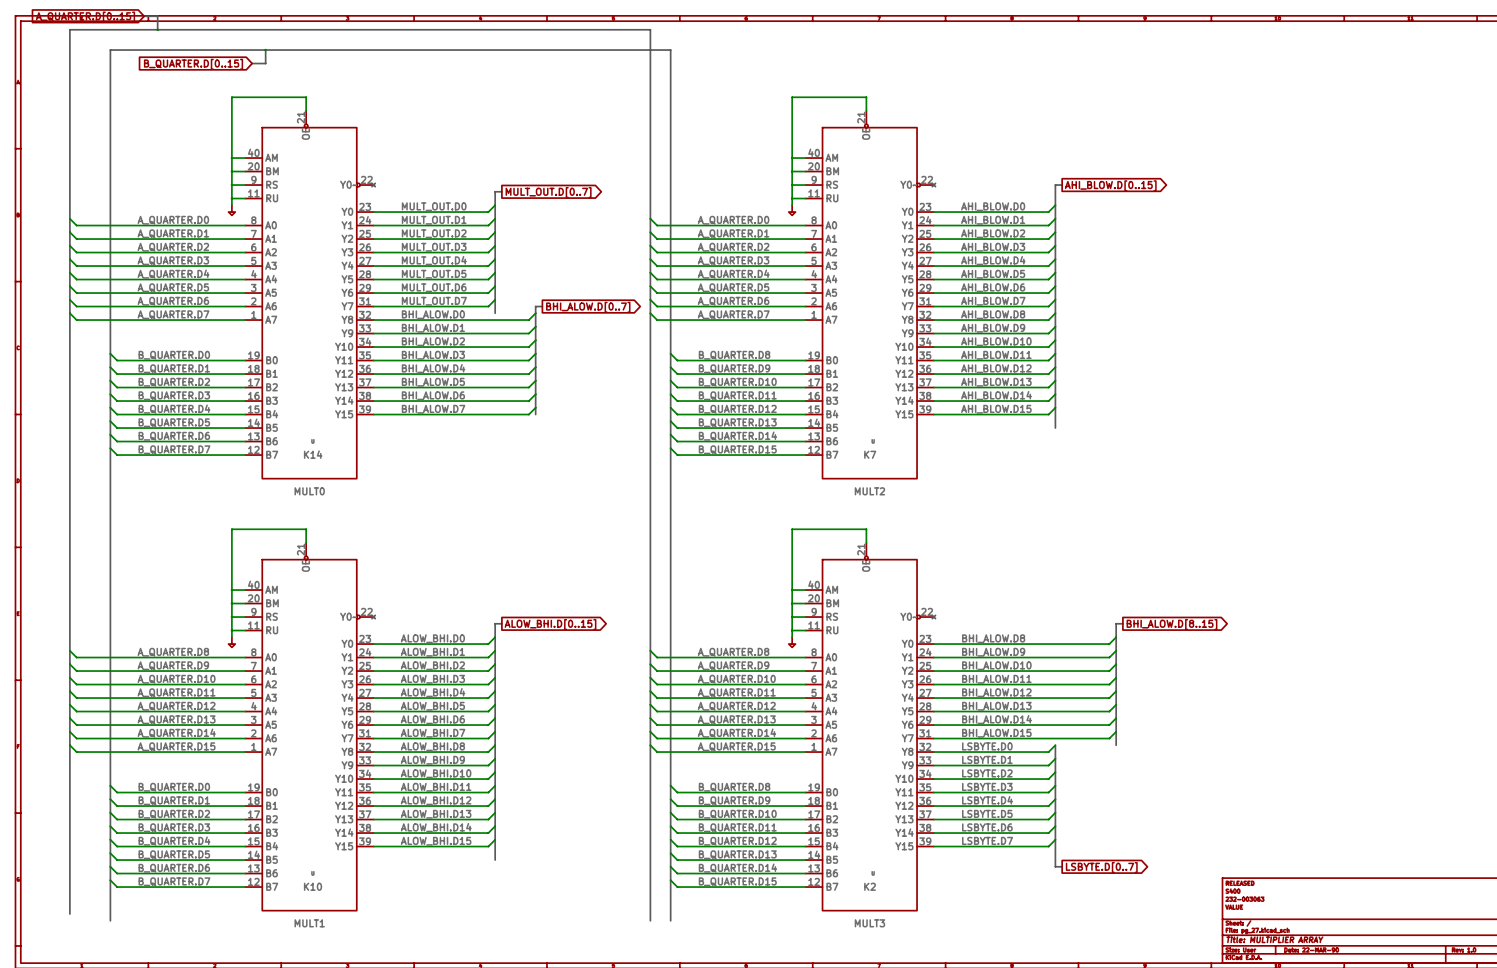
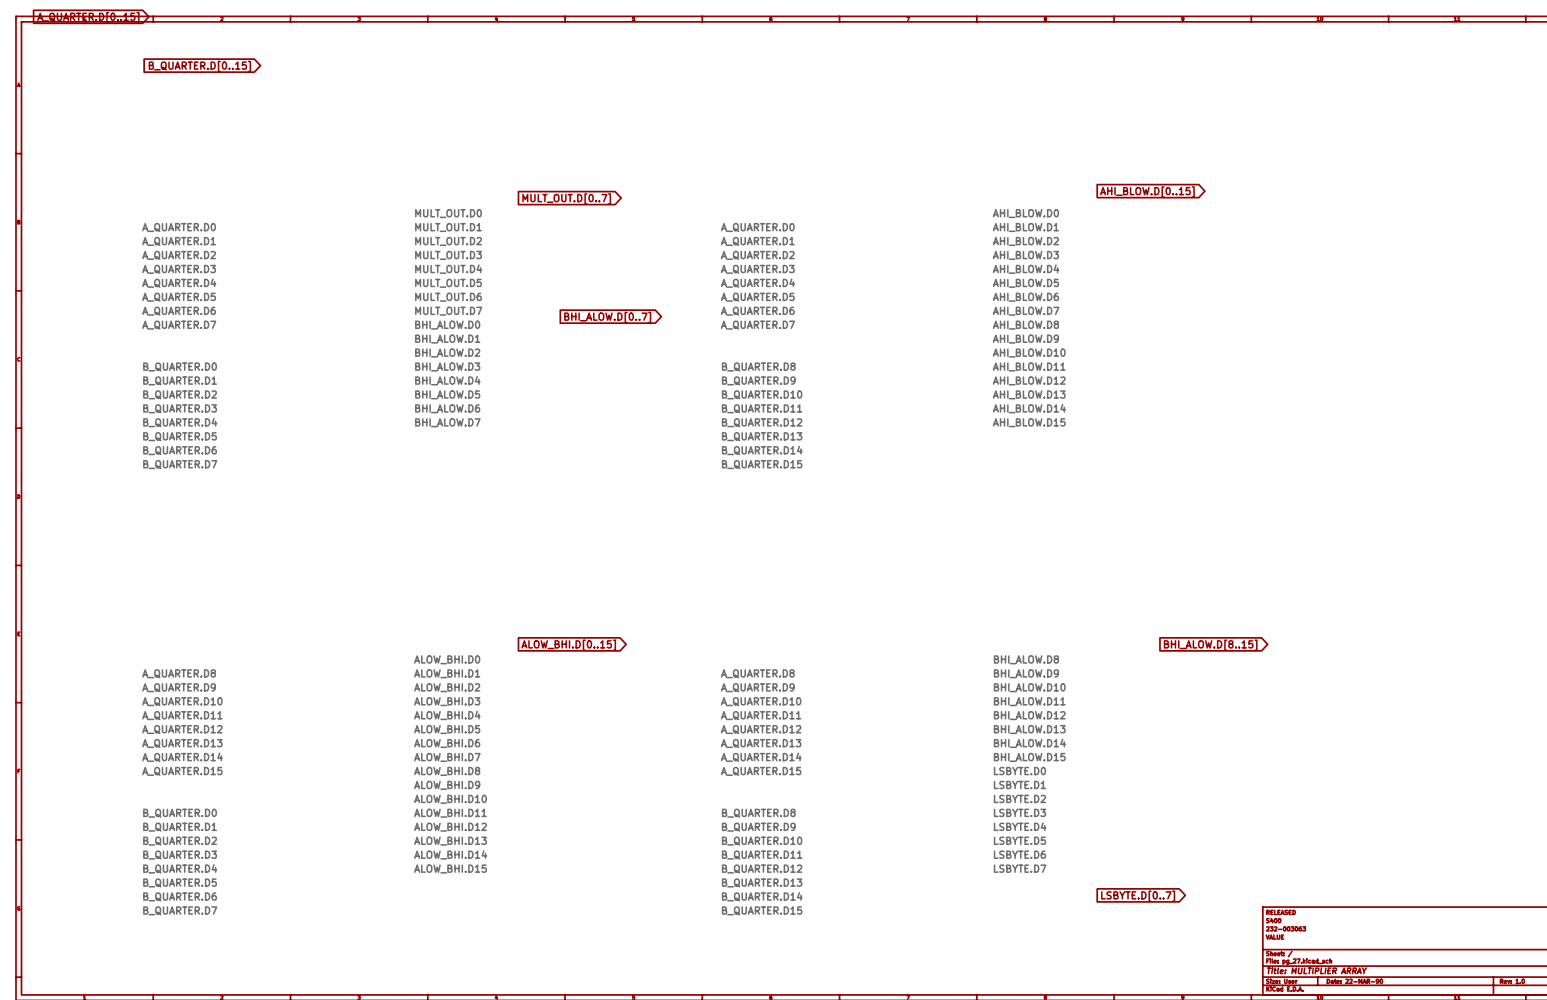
bus: (144, 16) (157, 16) (157, 29) -> none
junction: (157, 29) -> none
bus: (265, 50) (265, 63) (252, 63) -> none
junction: (265, 50) -> none
wire: (306, 110) (306, 97) (231, 97) (231, 205) -> none
wire: (866, 110) (866, 97) (792, 97) (792, 205) -> none
wire: (231, 158) (245, 158) -> none
wire: (792, 158) (805, 158) -> none
wire: (231, 171) (245, 171) -> none
wire: (792, 171) (805, 171) -> none
wire: (231, 185) (245, 185) -> none
no-connect mark: (373, 185) -> none
wire: (792, 185) (805, 185) -> none
no-connect mark: (933, 185) -> none
bus: (1062, 185) (1055, 185) (1055, 428) -> none
bus: (501, 191) (495, 191) (495, 313) -> none
wire: (231, 198) (245, 198) -> none
wire: (792, 198) (805, 198) -> none
wire: (495, 205) (488, 212) (373, 212) -> none
wire: (1055, 205) (1048, 212) (933, 212) -> none
power symbol: (231, 210) -> none
power symbol: (792, 210) -> none
wire: (69, 218) (76, 225) (245, 225) -> none
wire: (495, 218) (488, 225) (373, 225) -> none
wire: (650, 218) (657, 225) (805, 225) -> none
wire: (1055, 218) (1048, 225) (933, 225) -> none
wire: (69, 232) (76, 239) (245, 239) -> none
wire: (495, 232) (488, 239) (373, 239) -> none
wire: (650, 232) (657, 239) (805, 239) -> none
wire: (1055, 232) (1048, 239) (933, 239) -> none
wire: (69, 245) (76, 252) (245, 252) -> none
wire: (495, 245) (488, 252) (373, 252) -> none
wire: (650, 245) (657, 252) (805, 252) -> none
wire: (1055, 245) (1048, 252) (933, 252) -> none
wire: (69, 259) (76, 266) (245, 266) -> none
wire: (495, 259) (488, 266) (373, 266) -> none
wire: (650, 259) (657, 266) (805, 266) -> none
wire: (1055, 259) (1048, 266) (933, 266) -> none
wire: (69, 272) (76, 279) (245, 279) -> none
wire: (495, 272) (488, 279) (373, 279) -> none
wire: (650, 272) (657, 279) (805, 279) -> none
wire: (1055, 272) (1048, 279) (933, 279) -> none
wire: (69, 286) (76, 293) (245, 293) -> none
wire: (495, 286) (488, 293) (373, 293) -> none
wire: (650, 286) (657, 293) (805, 293) -> none
wire: (1055, 286) (1048, 293) (933, 293) -> none
part: (309, 294) -> none
part: (869, 294) -> none
wire: (69, 299) (76, 306) (245, 306) -> none
wire: (495, 299) (488, 306) (373, 306) -> none
wire: (650, 299) (657, 306) (805, 306) -> none
wire: (1055, 299) (1048, 306) (933, 306) -> none
bus: (542, 306) (535, 306) (535, 414) -> none
wire: (69, 313) (76, 320) (245, 320) -> none
wire: (535, 313) (528, 320) (373, 320) -> none
wire: (650, 313) (657, 320) (805, 320) -> none
wire: (1055, 313) (1048, 320) (933, 320) -> none
wire: (535, 326) (528, 333) (373, 333) -> none
wire: (1055, 326) (1048, 333) (933, 333) -> none
wire: (535, 340) (528, 347) (373, 347) -> none
wire: (1055, 340) (1048, 347) (933, 347) -> none
wire: (110, 353) (117, 360) (245, 360) -> none
wire: (535, 353) (528, 360) (373, 360) -> none
wire: (670, 353) (677, 360) (805, 360) -> none
wire: (1055, 353) (1048, 360) (933, 360) -> none
wire: (110, 367) (117, 374) (245, 374) -> none
wire: (535, 367) (528, 374) (373, 374) -> none
wire: (670, 367) (677, 374) (805, 374) -> none
wire: (1055, 367) (1048, 374) (933, 374) -> none
wire: (110, 380) (117, 387) (245, 387) -> none
wire: (535, 380) (528, 387) (373, 387) -> none
wire: (670, 380) (677, 387) (805, 387) -> none
wire: (1055, 380) (1048, 387) (933, 387) -> none
wire: (110, 394) (117, 401) (245, 401) -> none
wire: (535, 394) (528, 401) (373, 401) -> none
wire: (670, 394) (677, 401) (805, 401) -> none
wire: (1055, 394) (1048, 401) (933, 401) -> none
wire: (110, 407) (117, 414) (245, 414) -> none
wire: (535, 407) (528, 414) (373, 414) -> none
wire: (670, 407) (677, 414) (805, 414) -> none
wire: (1055, 407) (1048, 414) (933, 414) -> none
wire: (110, 421) (117, 428) (245, 428) -> none
wire: (670, 421) (677, 428) (805, 428) -> none
wire: (110, 434) (117, 441) (245, 441) -> none
wire: (670, 434) (677, 441) (805, 441) -> none
wire: (110, 448) (117, 455) (245, 455) -> none
wire: (670, 448) (677, 455) (805, 455) -> none
wire: (306, 542) (306, 529) (231, 529) (231, 637) -> none
wire: (866, 542) (866, 529) (792, 529) (792, 637) -> none
wire: (231, 590) (245, 590) -> none
wire: (792, 590) (805, 590) -> none
wire: (231, 603) (245, 603) -> none
wire: (792, 603) (805, 603) -> none
wire: (231, 617) (245, 617) -> none
no-connect mark: (373, 617) -> none
wire: (792, 617) (805, 617) -> none
no-connect mark: (933, 617) -> none
bus: (501, 623) (495, 623) (495, 860) -> none
bus: (1122, 623) (1116, 623) (1116, 745) -> none
wire: (231, 630) (245, 630) -> none
wire: (792, 630) (805, 630) -> none
wire: (495, 637) (488, 644) (373, 644) -> none
wire: (1116, 637) (1109, 644) (933, 644) -> none
power symbol: (231, 642) -> none
power symbol: (792, 642) -> none
wire: (69, 650) (76, 657) (245, 657) -> none
wire: (495, 650) (488, 657) (373, 657) -> none
wire: (650, 650) (657, 657) (805, 657) -> none
wire: (1116, 650) (1109, 657) (933, 657) -> none
wire: (69, 664) (76, 671) (245, 671) -> none
wire: (495, 664) (488, 671) (373, 671) -> none
wire: (650, 664) (657, 671) (805, 671) -> none
wire: (1116, 664) (1109, 671) (933, 671) -> none
wire: (69, 677) (76, 684) (245, 684) -> none
wire: (495, 677) (488, 684) (373, 684) -> none
wire: (650, 677) (657, 684) (805, 684) -> none
wire: (1116, 677) (1109, 684) (933, 684) -> none
wire: (69, 691) (76, 698) (245, 698) -> none
wire: (495, 691) (488, 698) (373, 698) -> none
wire: (650, 691) (657, 698) (805, 698) -> none
wire: (1116, 691) (1109, 698) (933, 698) -> none
wire: (69, 704) (76, 711) (245, 711) -> none
wire: (495, 704) (488, 711) (373, 711) -> none
wire: (650, 704) (657, 711) (805, 711) -> none
wire: (1116, 704) (1109, 711) (933, 711) -> none
wire: (69, 718) (76, 725) (245, 725) -> none
wire: (495, 718) (488, 725) (373, 725) -> none
wire: (650, 718) (657, 725) (805, 725) -> none
wire: (1116, 718) (1109, 725) (933, 725) -> none
part: (309, 726) -> none
part: (869, 726) -> none
wire: (69, 731) (76, 738) (245, 738) -> none
wire: (495, 731) (488, 738) (373, 738) -> none
wire: (650, 731) (657, 738) (805, 738) -> none
wire: (1116, 731) (1109, 738) (933, 738) -> none
wire: (69, 745) (76, 752) (245, 752) -> none
wire: (495, 745) (488, 752) (373, 752) -> none
wire: (650, 745) (657, 752) (805, 752) -> none
wire: (1055, 745) (1048, 752) (933, 752) -> none
bus: (1055, 745) (1055, 866) (1062, 866) -> none
wire: (495, 758) (488, 765) (373, 765) -> none
wire: (1055, 758) (1048, 765) (933, 765) -> none
wire: (495, 772) (488, 779) (373, 779) -> none
wire: (1055, 772) (1048, 779) (933, 779) -> none
wire: (110, 785) (117, 792) (245, 792) -> none
wire: (495, 785) (488, 792) (373, 792) -> none
wire: (670, 785) (677, 792) (805, 792) -> none
wire: (1055, 785) (1048, 792) (933, 792) -> none
wire: (110, 799) (117, 806) (245, 806) -> none
wire: (495, 799) (488, 806) (373, 806) -> none
wire: (670, 799) (677, 806) (805, 806) -> none
wire: (1055, 799) (1048, 806) (933, 806) -> none
wire: (110, 812) (117, 819) (245, 819) -> none
wire: (495, 812) (488, 819) (373, 819) -> none
wire: (670, 812) (677, 819) (805, 819) -> none
wire: (1055, 812) (1048, 819) (933, 819) -> none
wire: (110, 826) (117, 833) (245, 833) -> none
wire: (495, 826) (488, 833) (373, 833) -> none
wire: (670, 826) (677, 833) (805, 833) -> none
wire: (1055, 826) (1048, 833) (933, 833) -> none
wire: (110, 839) (117, 846) (245, 846) -> none
wire: (495, 839) (488, 846) (373, 846) -> none
wire: (670, 839) (677, 846) (805, 846) -> none
wire: (1055, 839) (1048, 846) (933, 846) -> none
wire: (110, 853) (117, 860) (245, 860) -> none
wire: (670, 853) (677, 860) (805, 860) -> none
wire: (110, 866) (117, 873) (245, 873) -> none
wire: (670, 866) (677, 873) (805, 873) -> none
wire: (110, 880) (117, 887) (245, 887) -> none
wire: (670, 880) (677, 887) (805, 887) -> none
bus: (69, 914) (69, 29) (650, 29) (650, 920) -> none
bus: (110, 920) (110, 50) (670, 50) (670, 920) -> none

